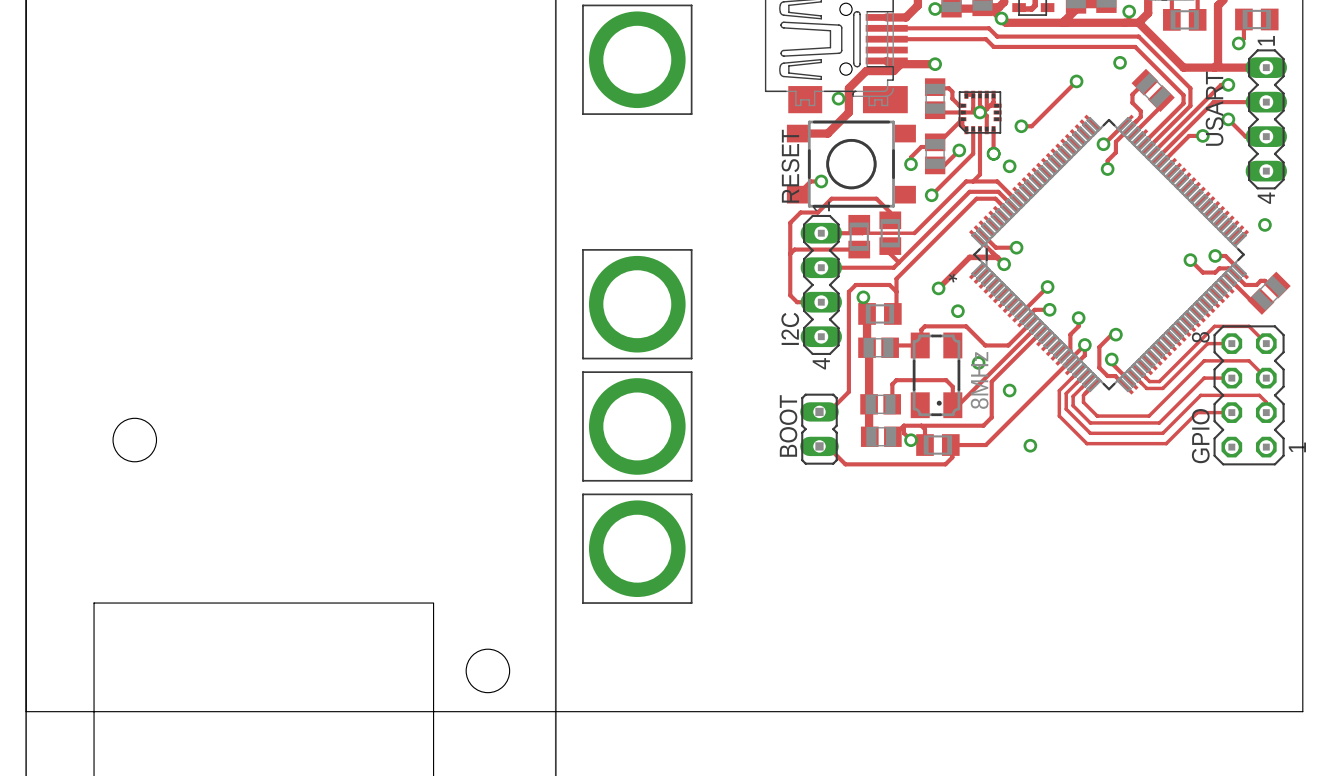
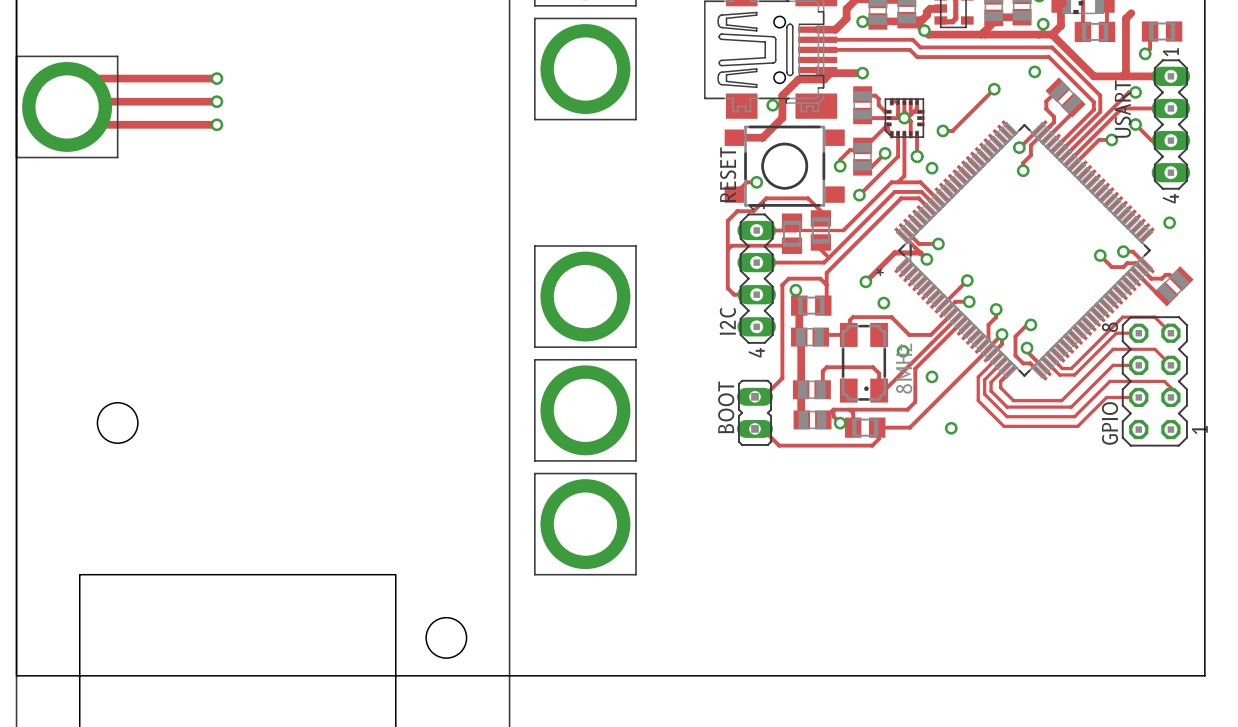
track: none -> (216, 78) (97, 78) (67, 106) (84, 124) (216, 124)
via: none -> (216, 78)
track: none -> (74, 101) (216, 101)
via: none -> (216, 101)
part: none -> (67, 106)
via: none -> (216, 124)

